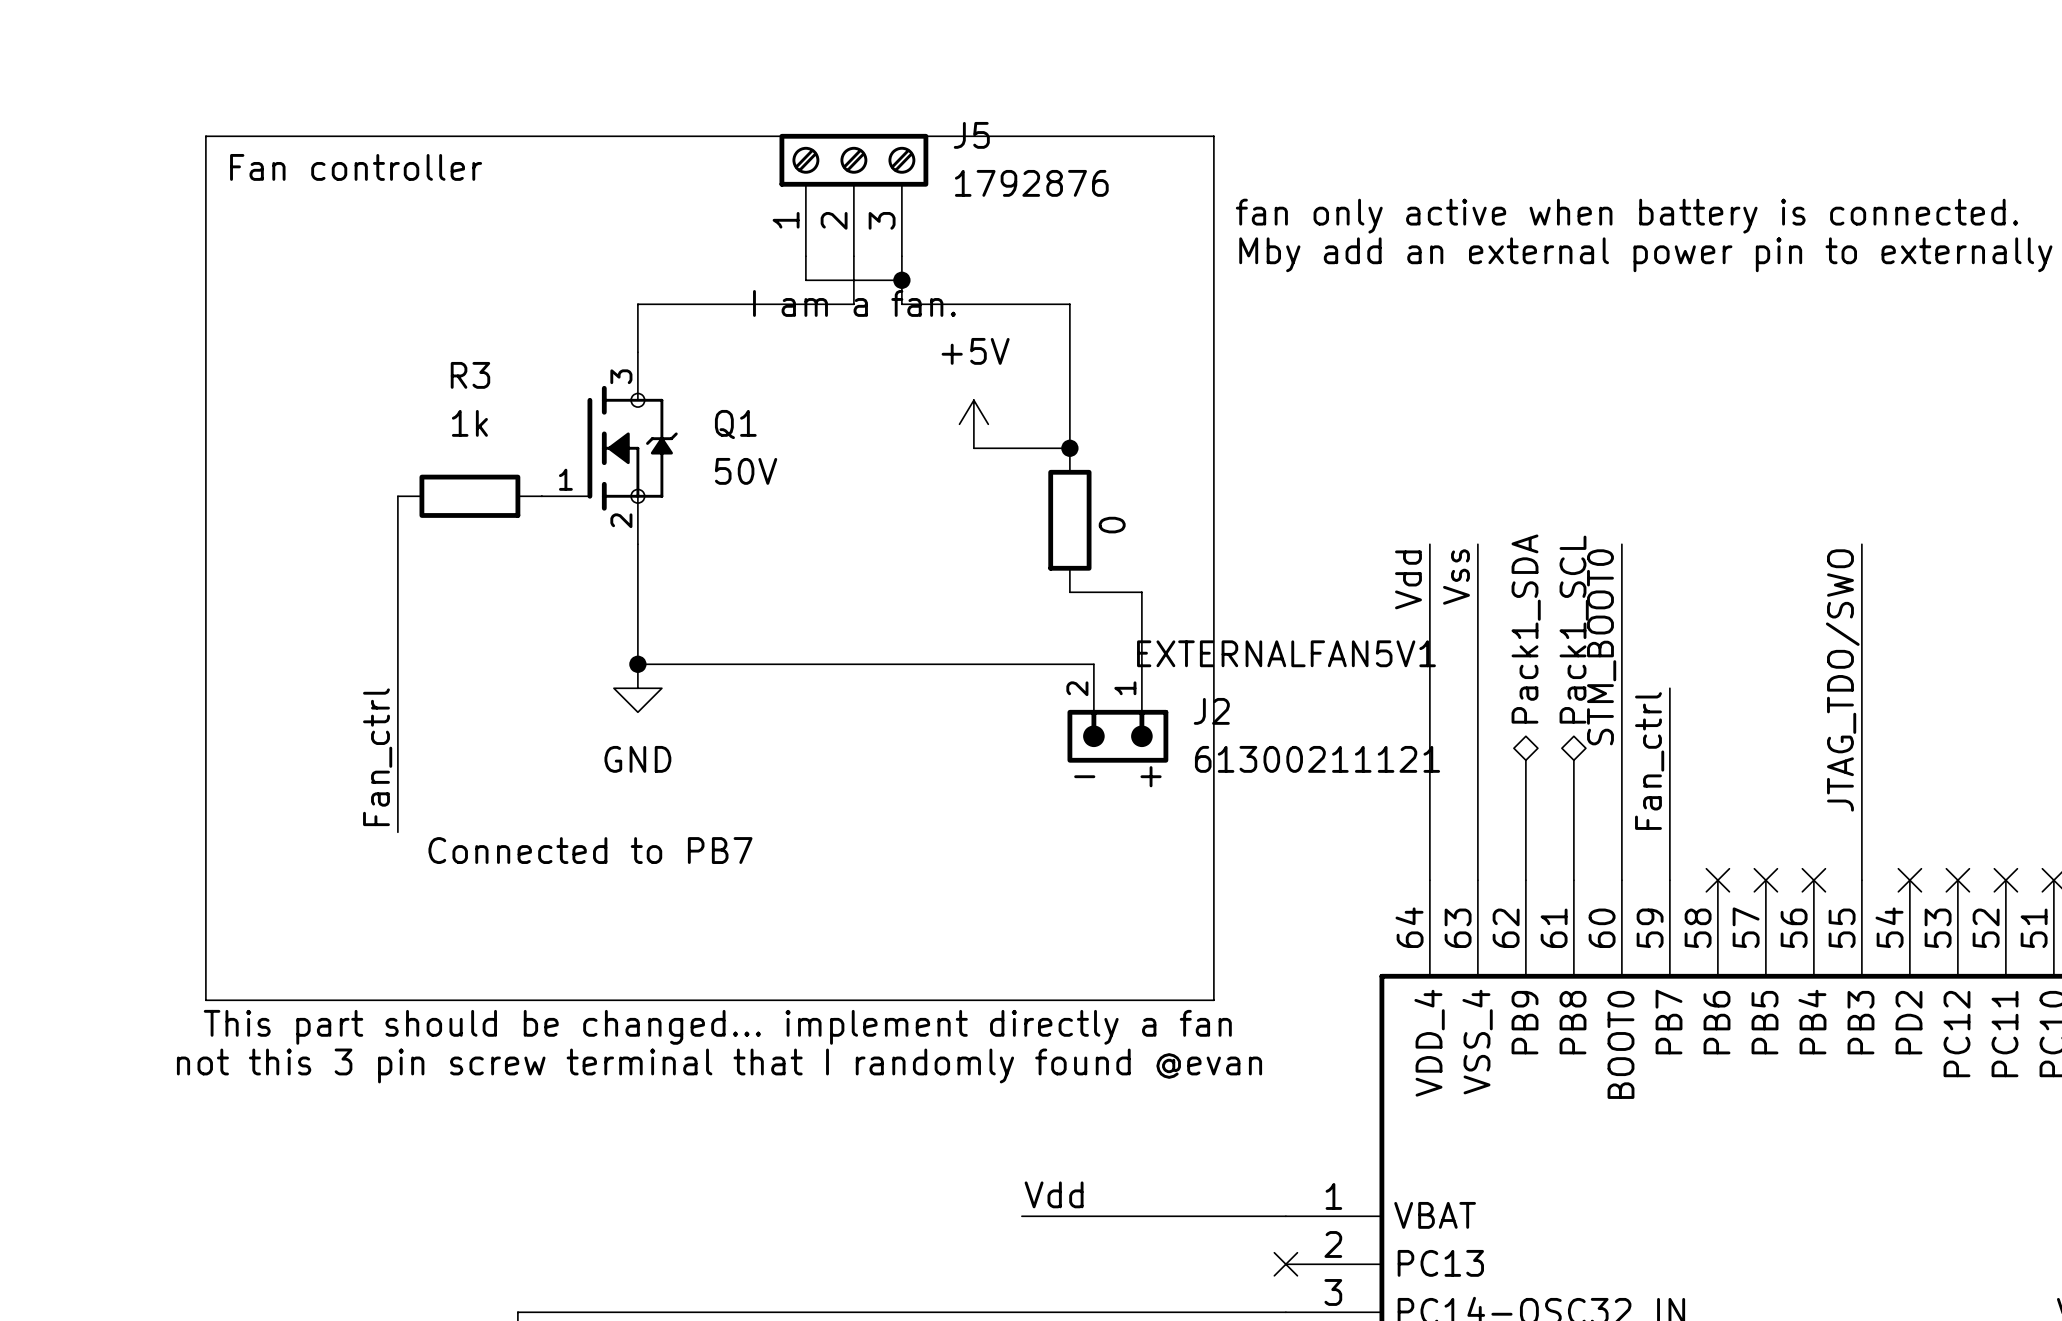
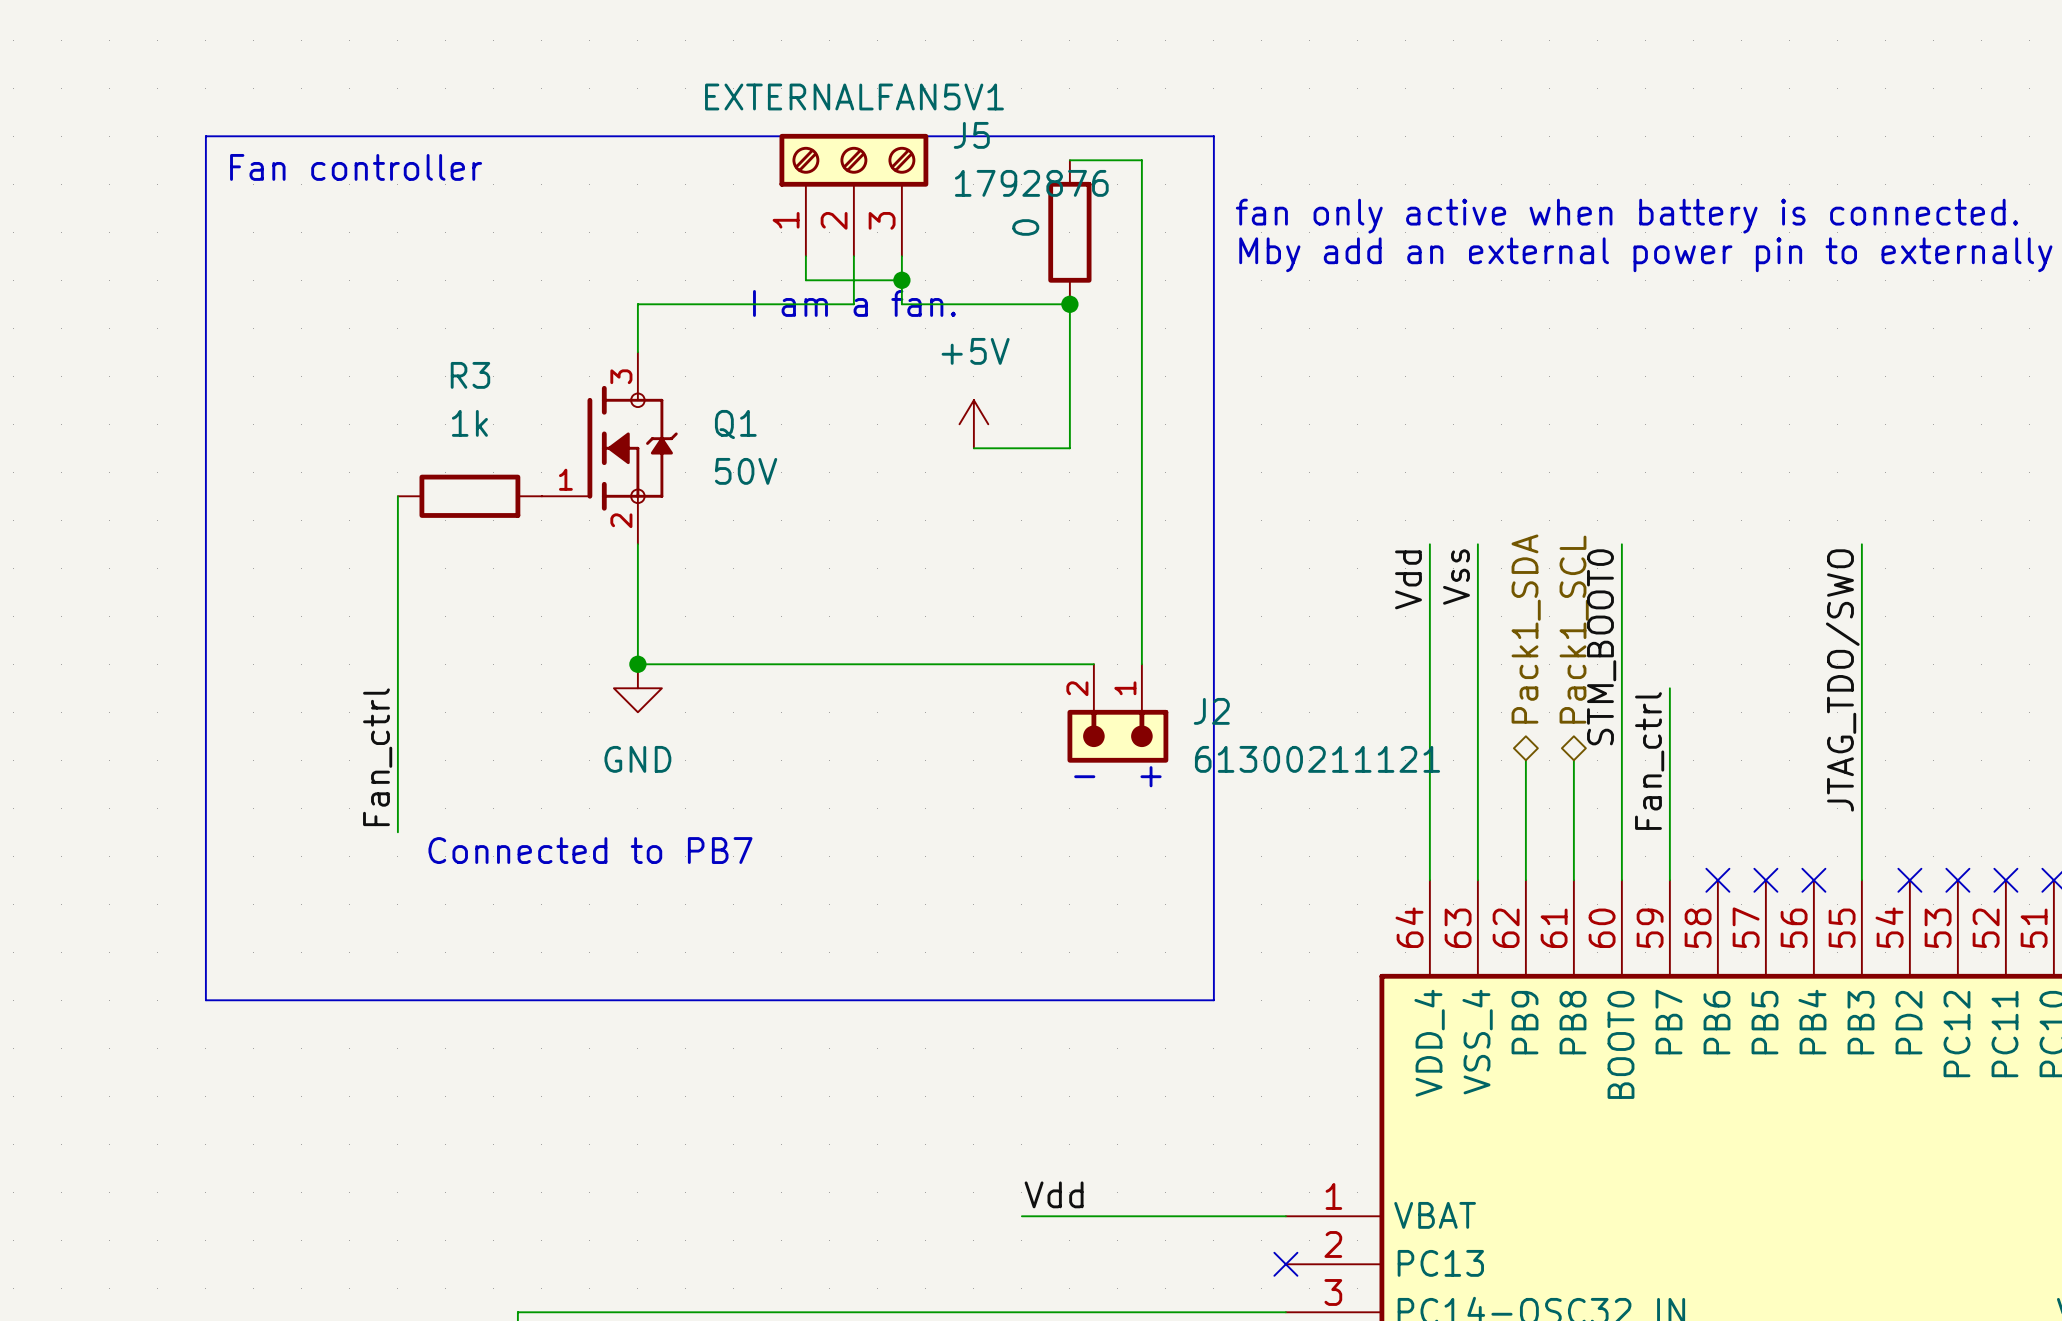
junction: none -> (1069, 304)
junction: (1069, 448) -> none
EXTERNALFAN5V1 position: (1069, 520) -> (1069, 232)
EXTERNALFAN5V1 value position: 0 (1112, 525) -> 0 (1025, 227)
wire: (1069, 592) (1141, 592) -> (1069, 160) (1141, 160) (1141, 592)
EXTERNALFAN5V1 name position: EXTERNALFAN5V1 (1286, 653) -> EXTERNALFAN5V1 (854, 96)
text: This part should be changed... implement directly a fan (717, 1027) -> none
text: not this 3 pin screw terminal that I randomly found @evan (719, 1065) -> none

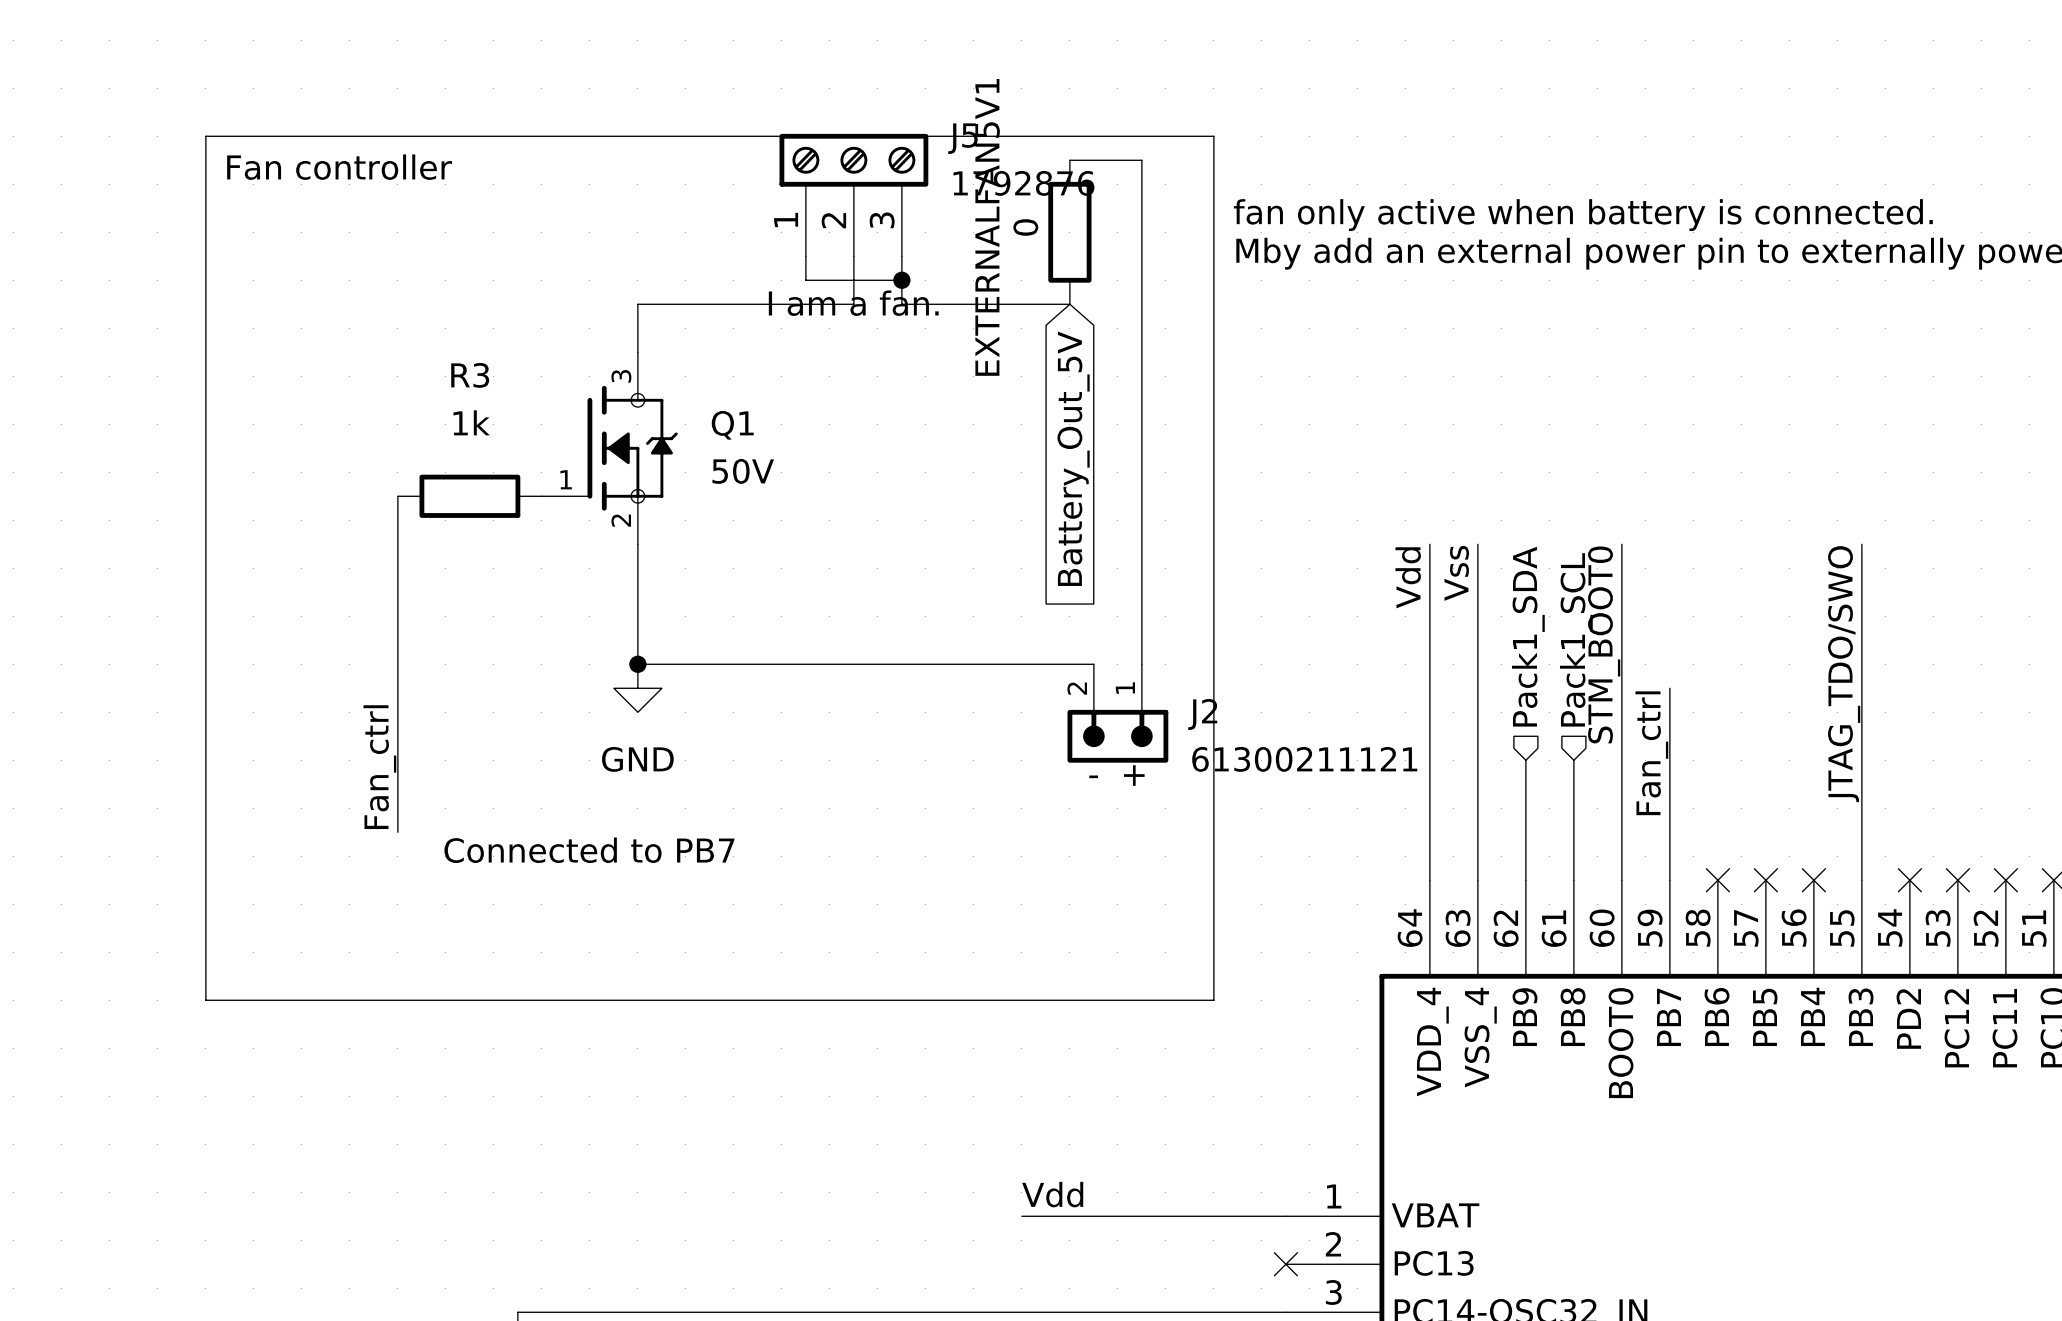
EXTERNALFAN5V1 name rotation: 0° (854, 96) -> 90° counterclockwise (987, 227)
wire: (1069, 304) (1069, 448) (973, 448) -> none
junction: (1069, 304) -> none
power symbol: +5V (973, 424) -> none
global label: none -> Battery_Out_5V (1073, 458)
hierarchical label shape: bidirectional (1526, 629) -> input (1528, 636)
hierarchical label shape: bidirectional (1574, 629) -> input (1576, 639)

